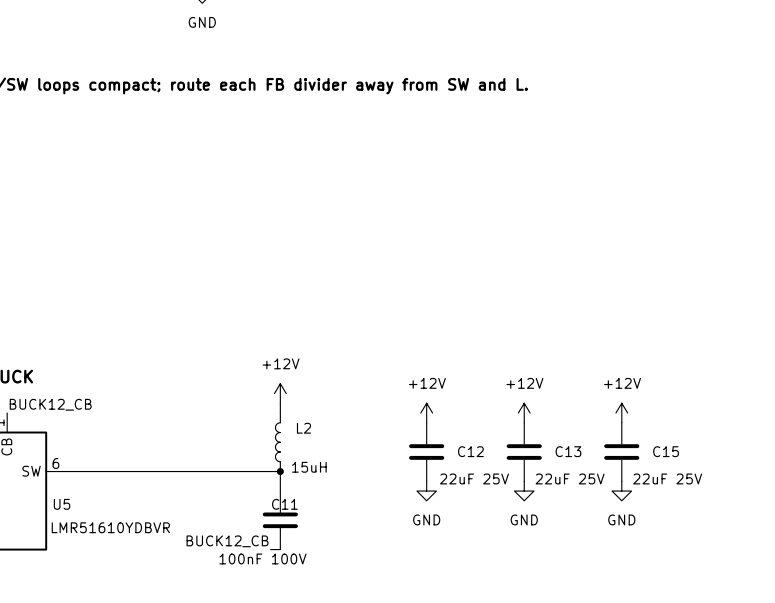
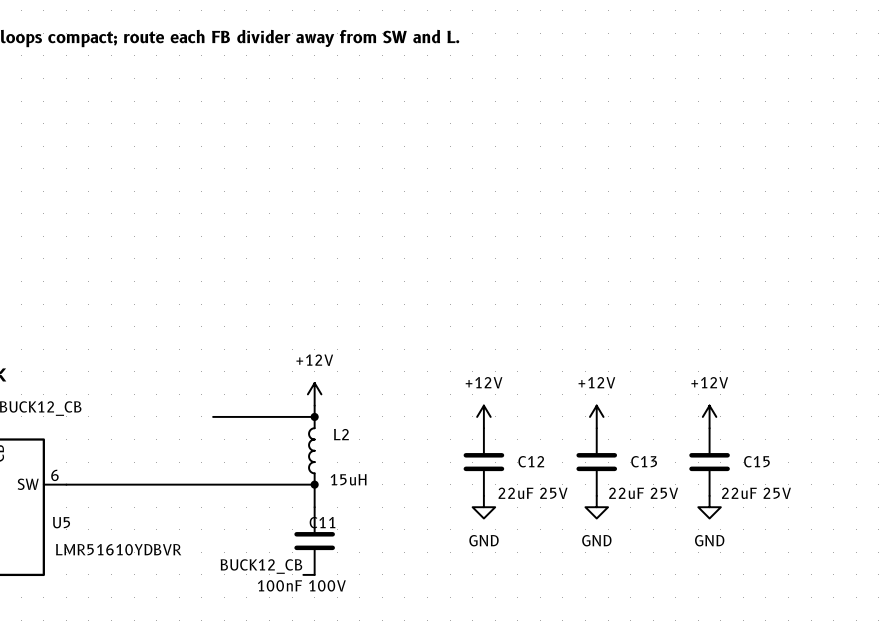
wire: none -> (213, 416) (314, 416)
junction: none -> (314, 416)

